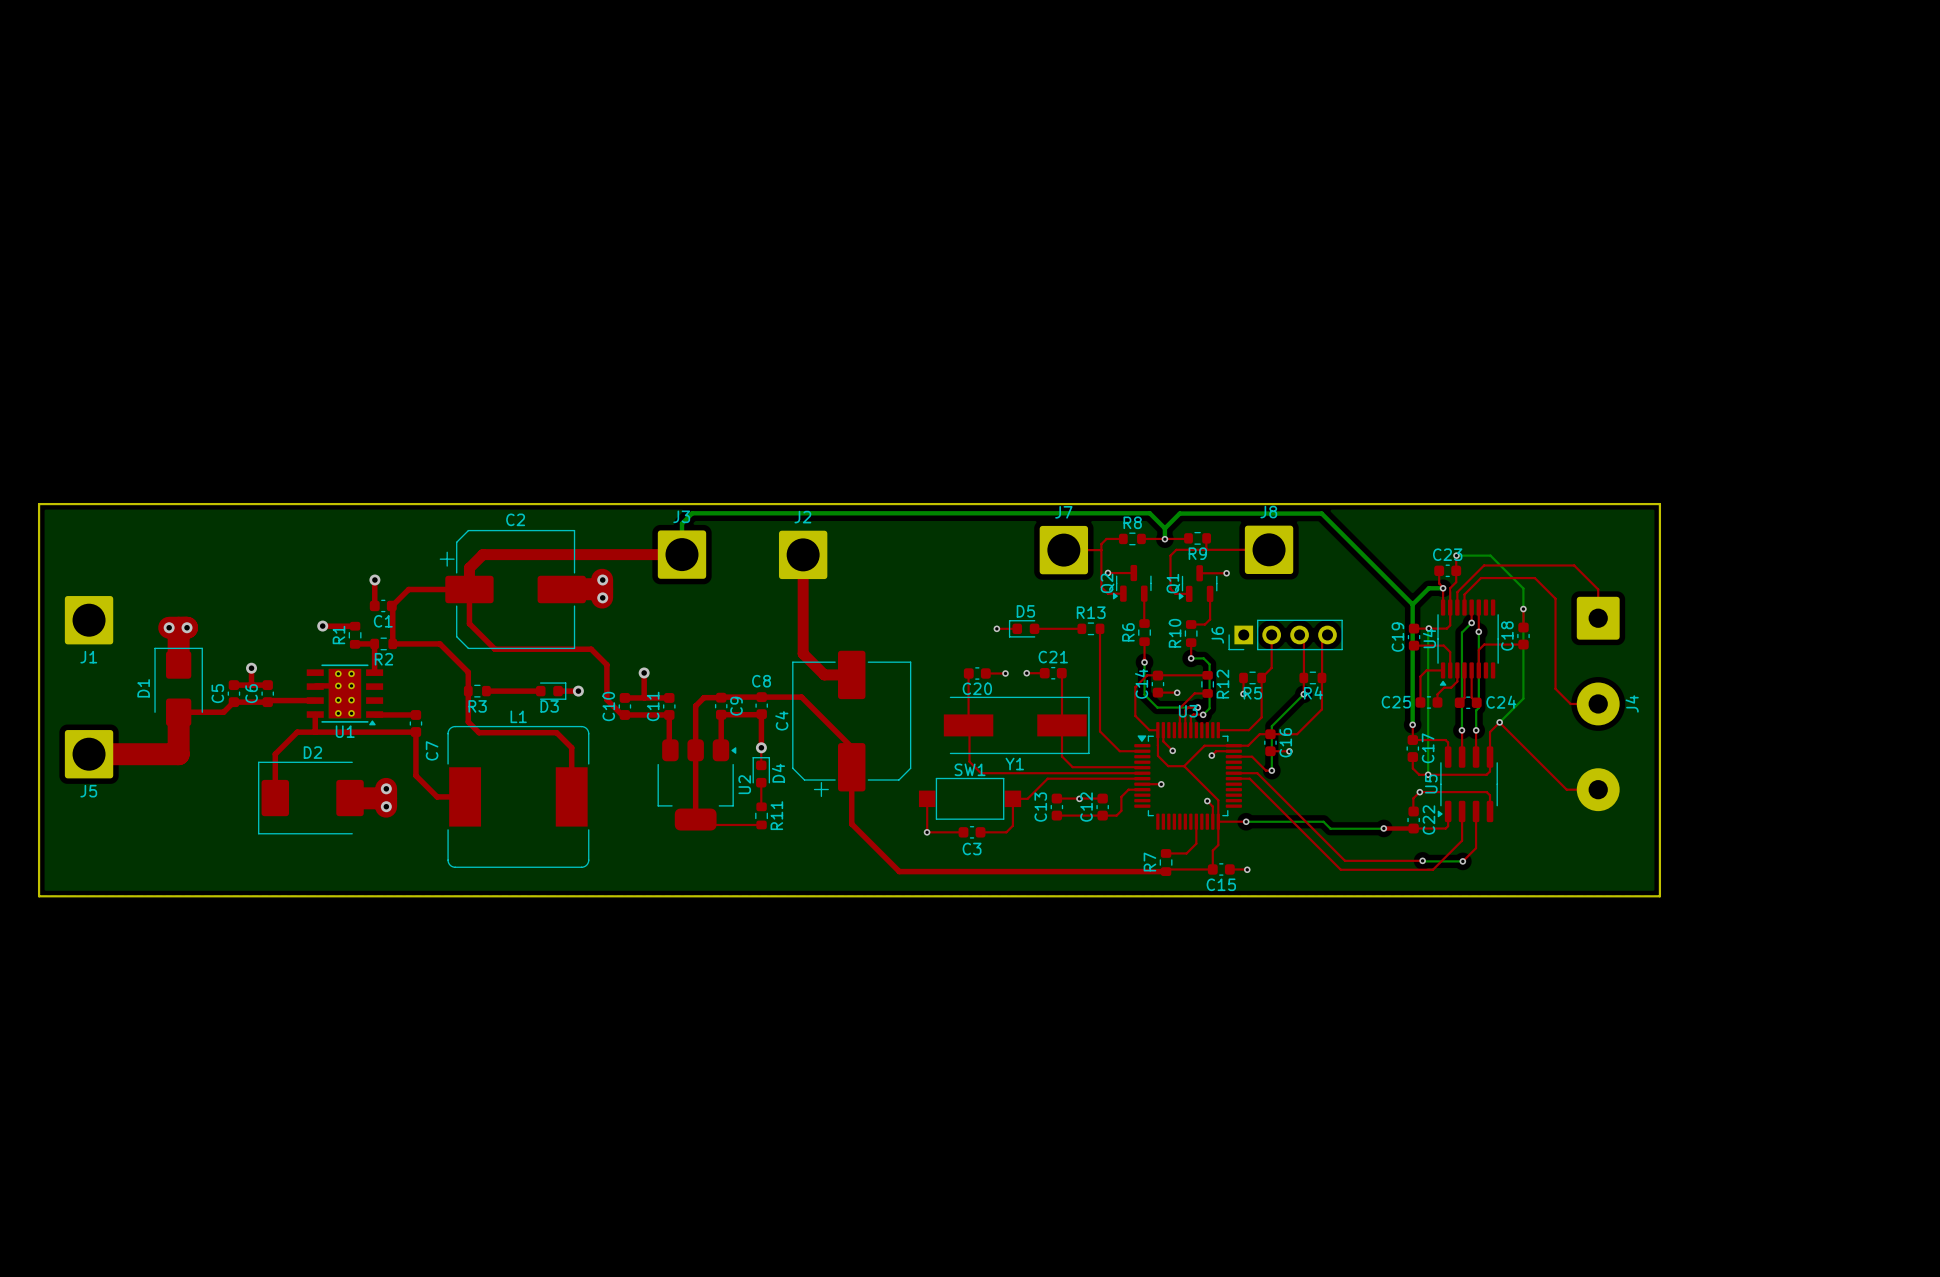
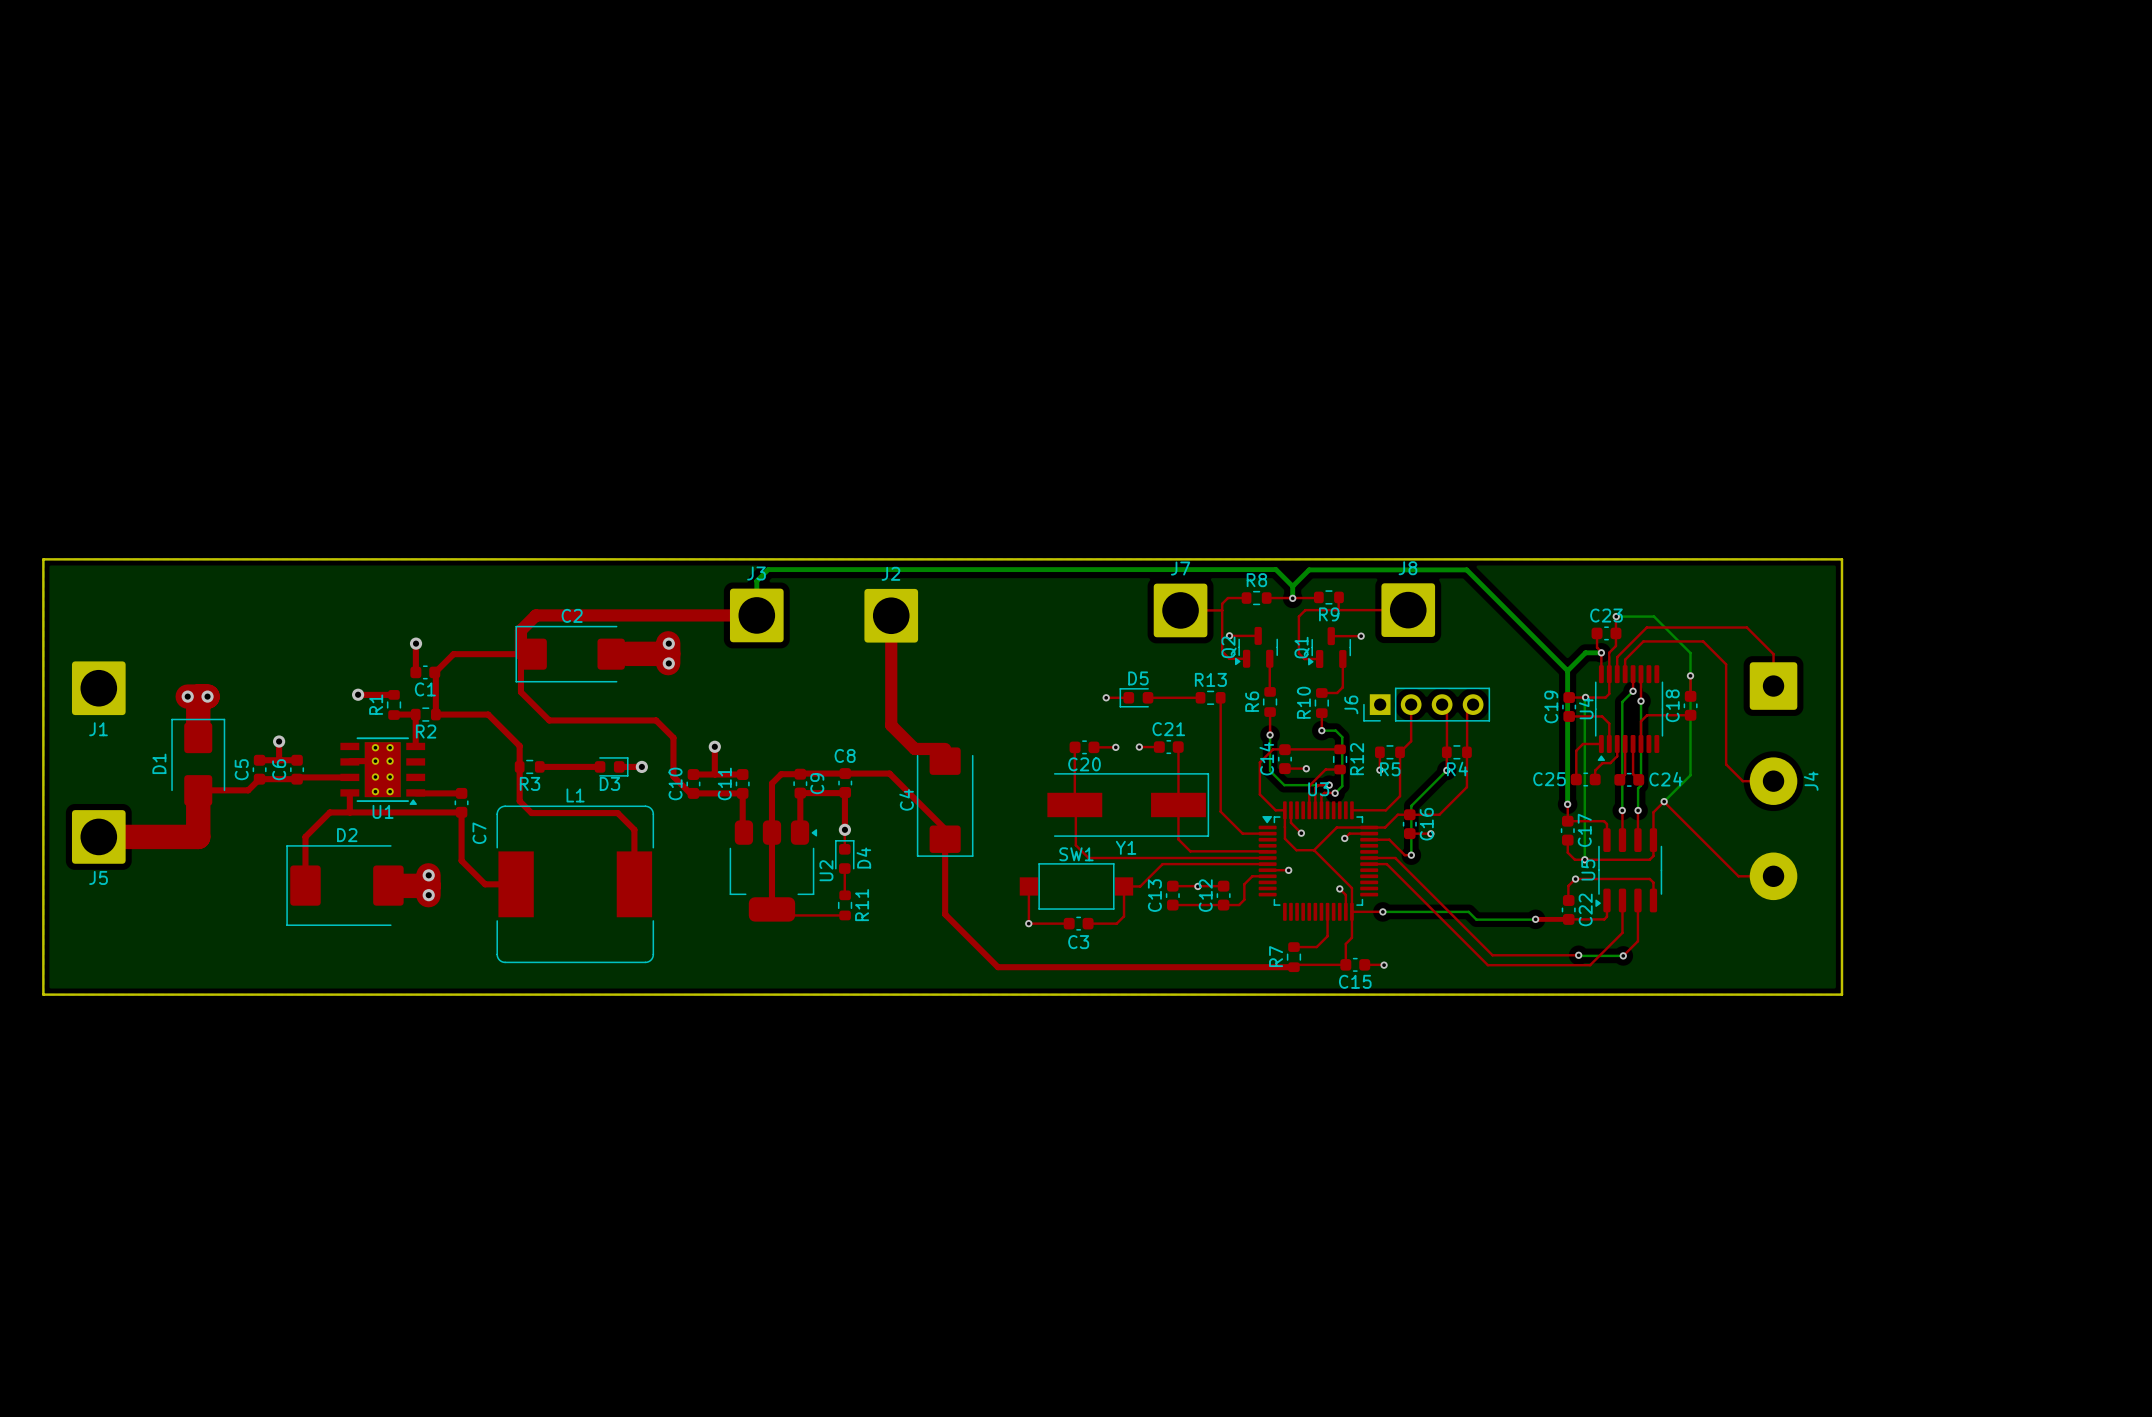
C2 name position: C2 (515, 519) -> C2 (572, 615)
C2 footprint: [439, 529, 586, 650] -> [515, 625, 625, 683]
C4 footprint: [792, 650, 912, 798] -> [916, 747, 974, 857]
C4 name position: C4 (781, 720) -> C4 (906, 799)

